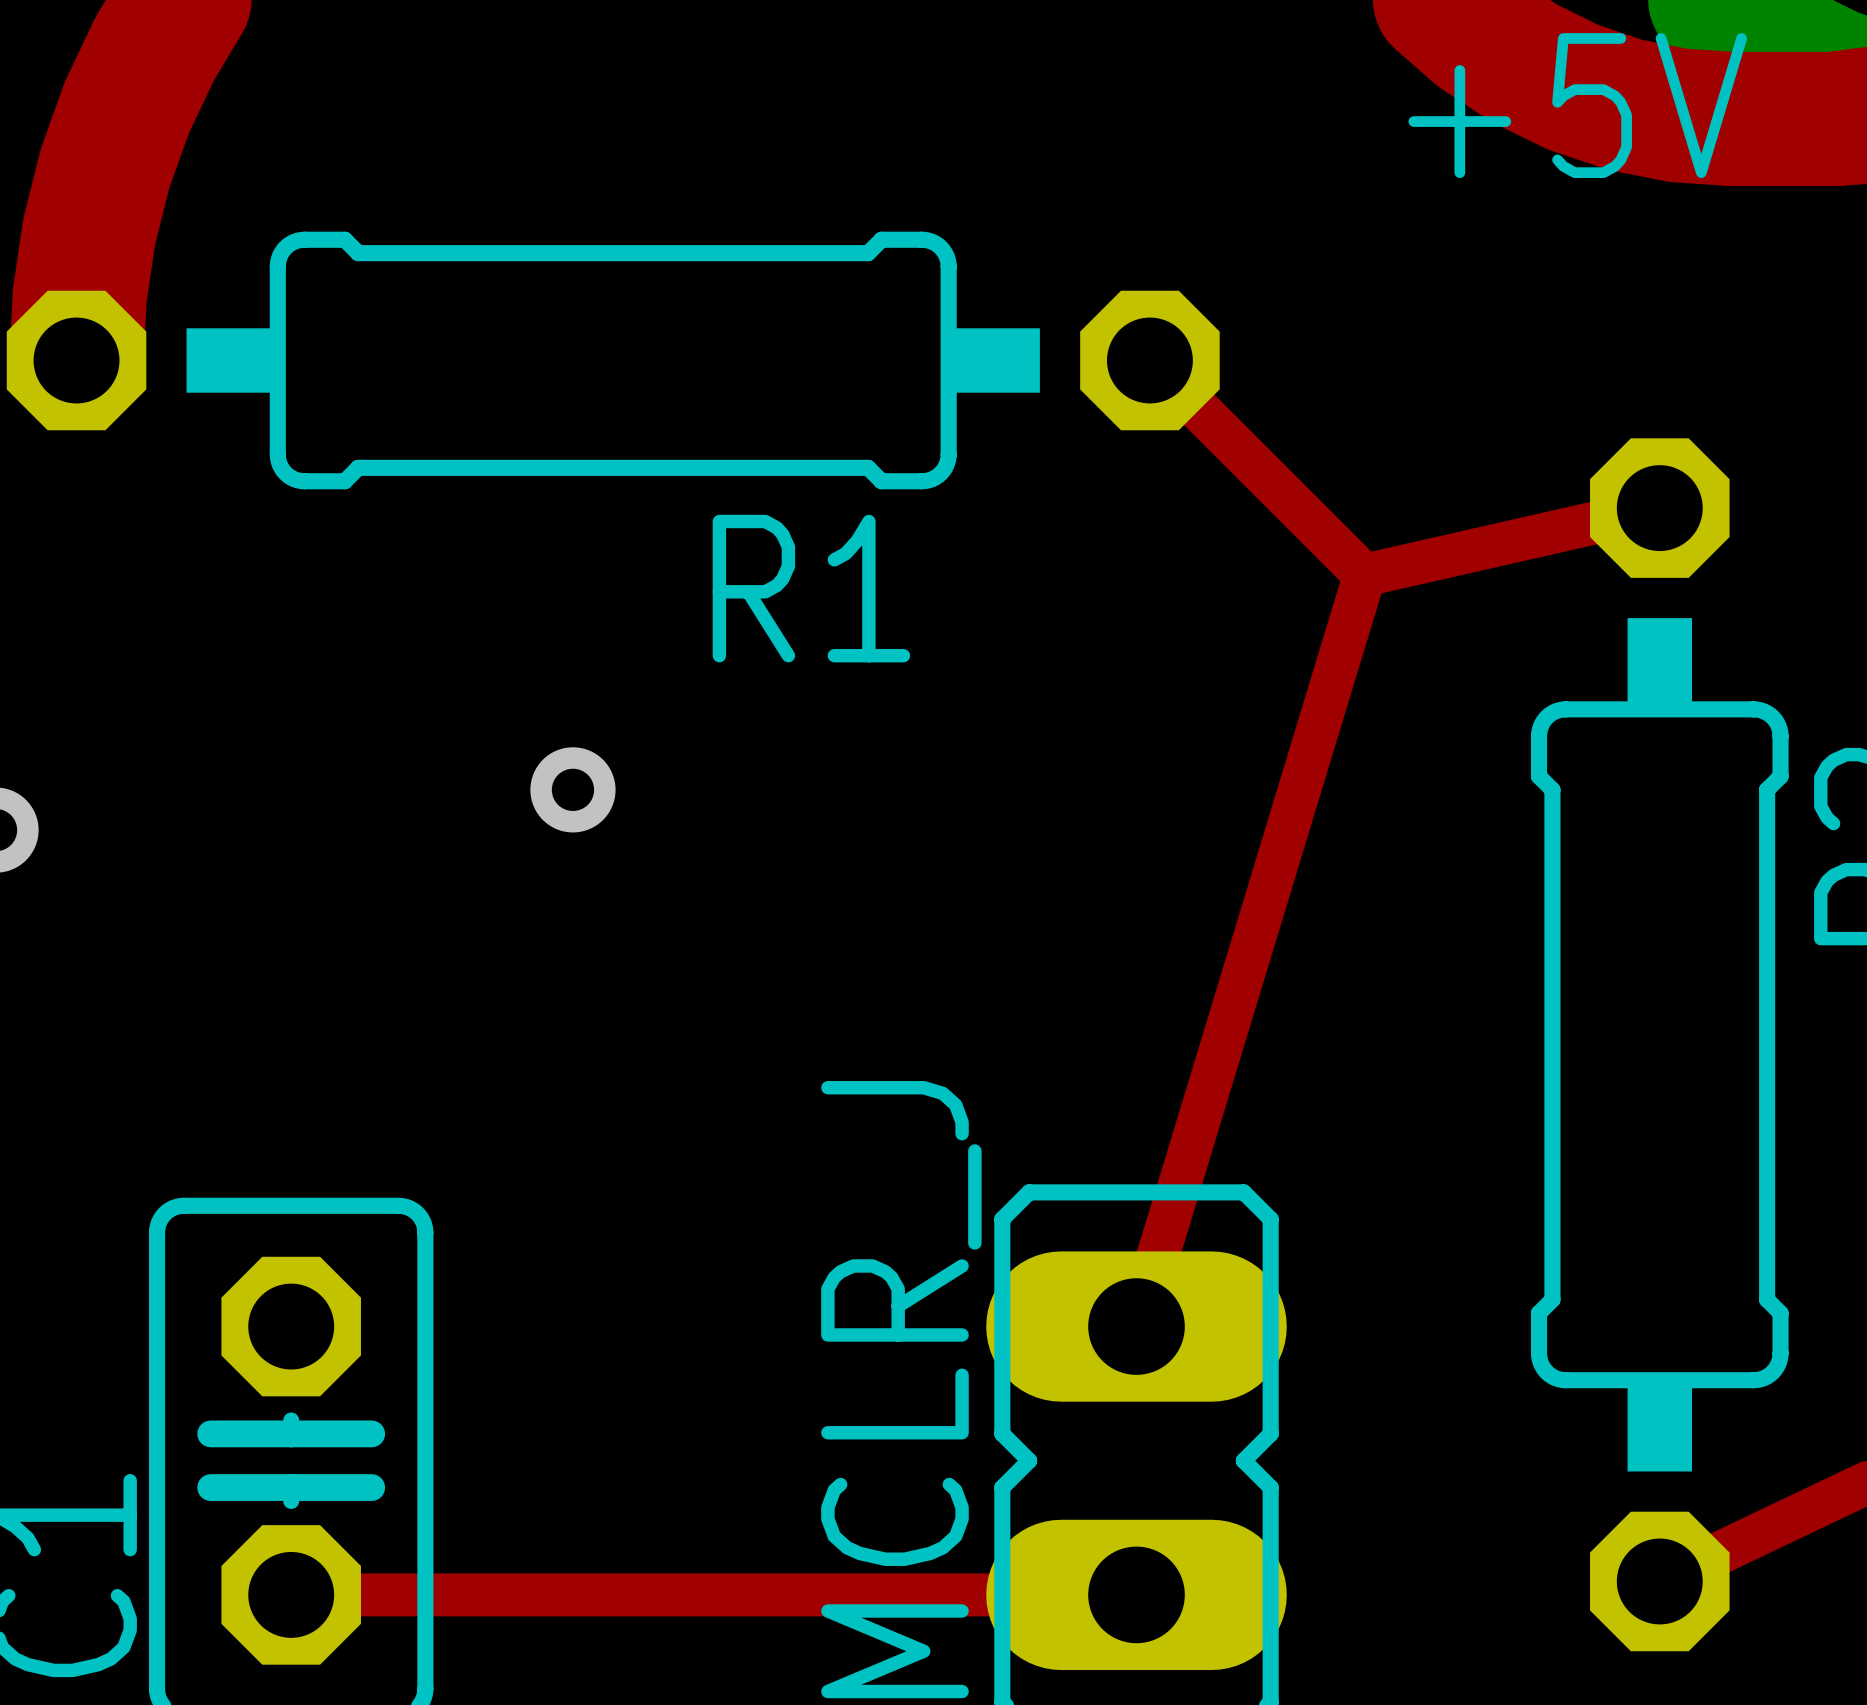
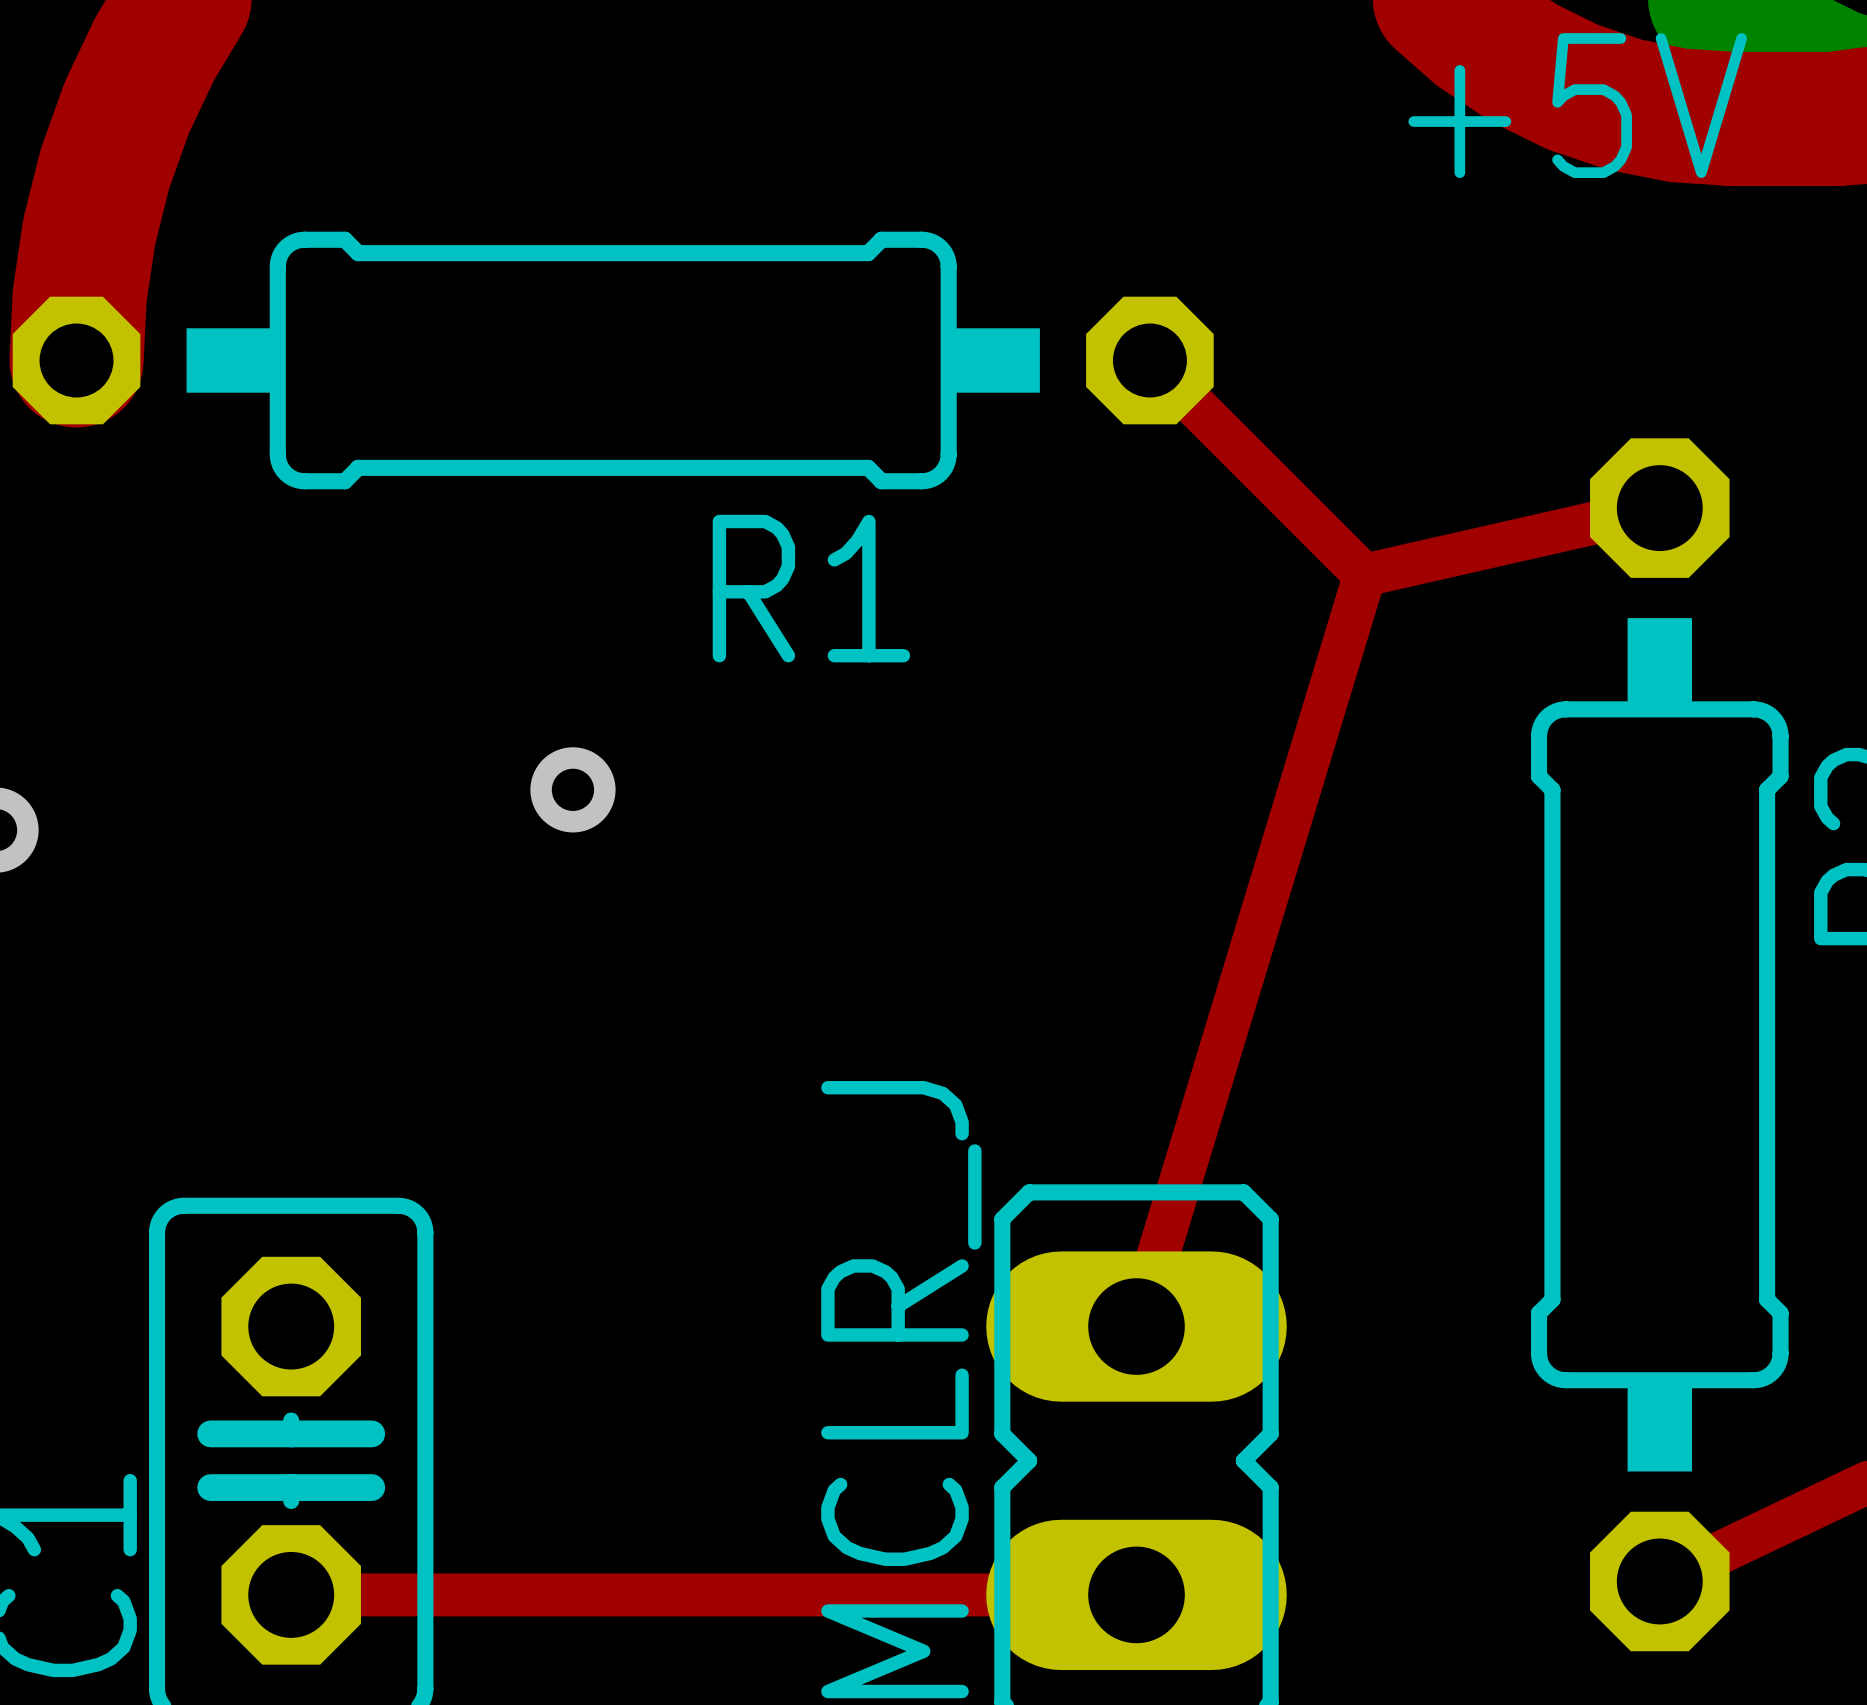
R1 footprint: [6, 231, 1220, 490] -> [12, 231, 1214, 490]

